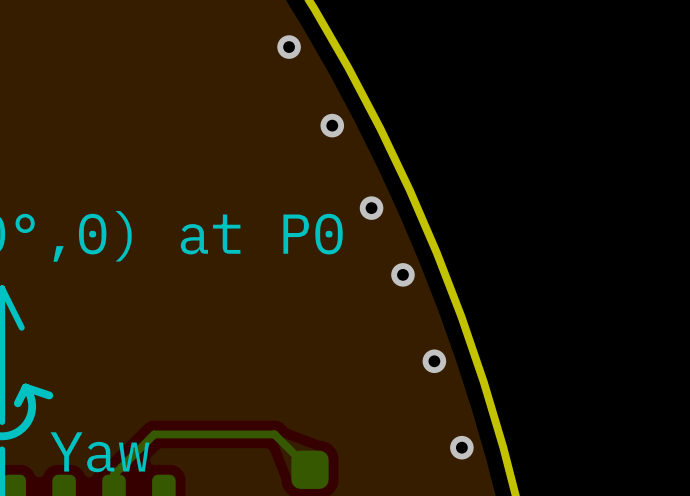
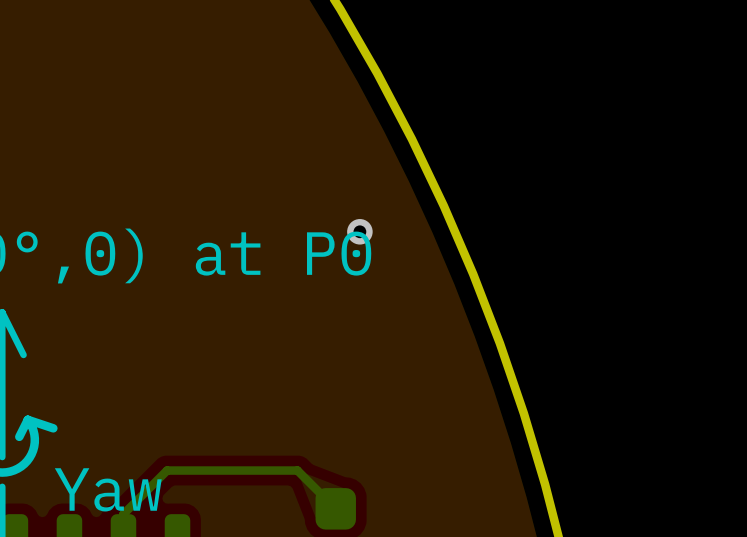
via: (289, 47) -> none
via: (332, 125) -> none
via position: (371, 208) -> (359, 231)
via: (402, 274) -> none
via: (434, 361) -> none
via: (461, 447) -> none

